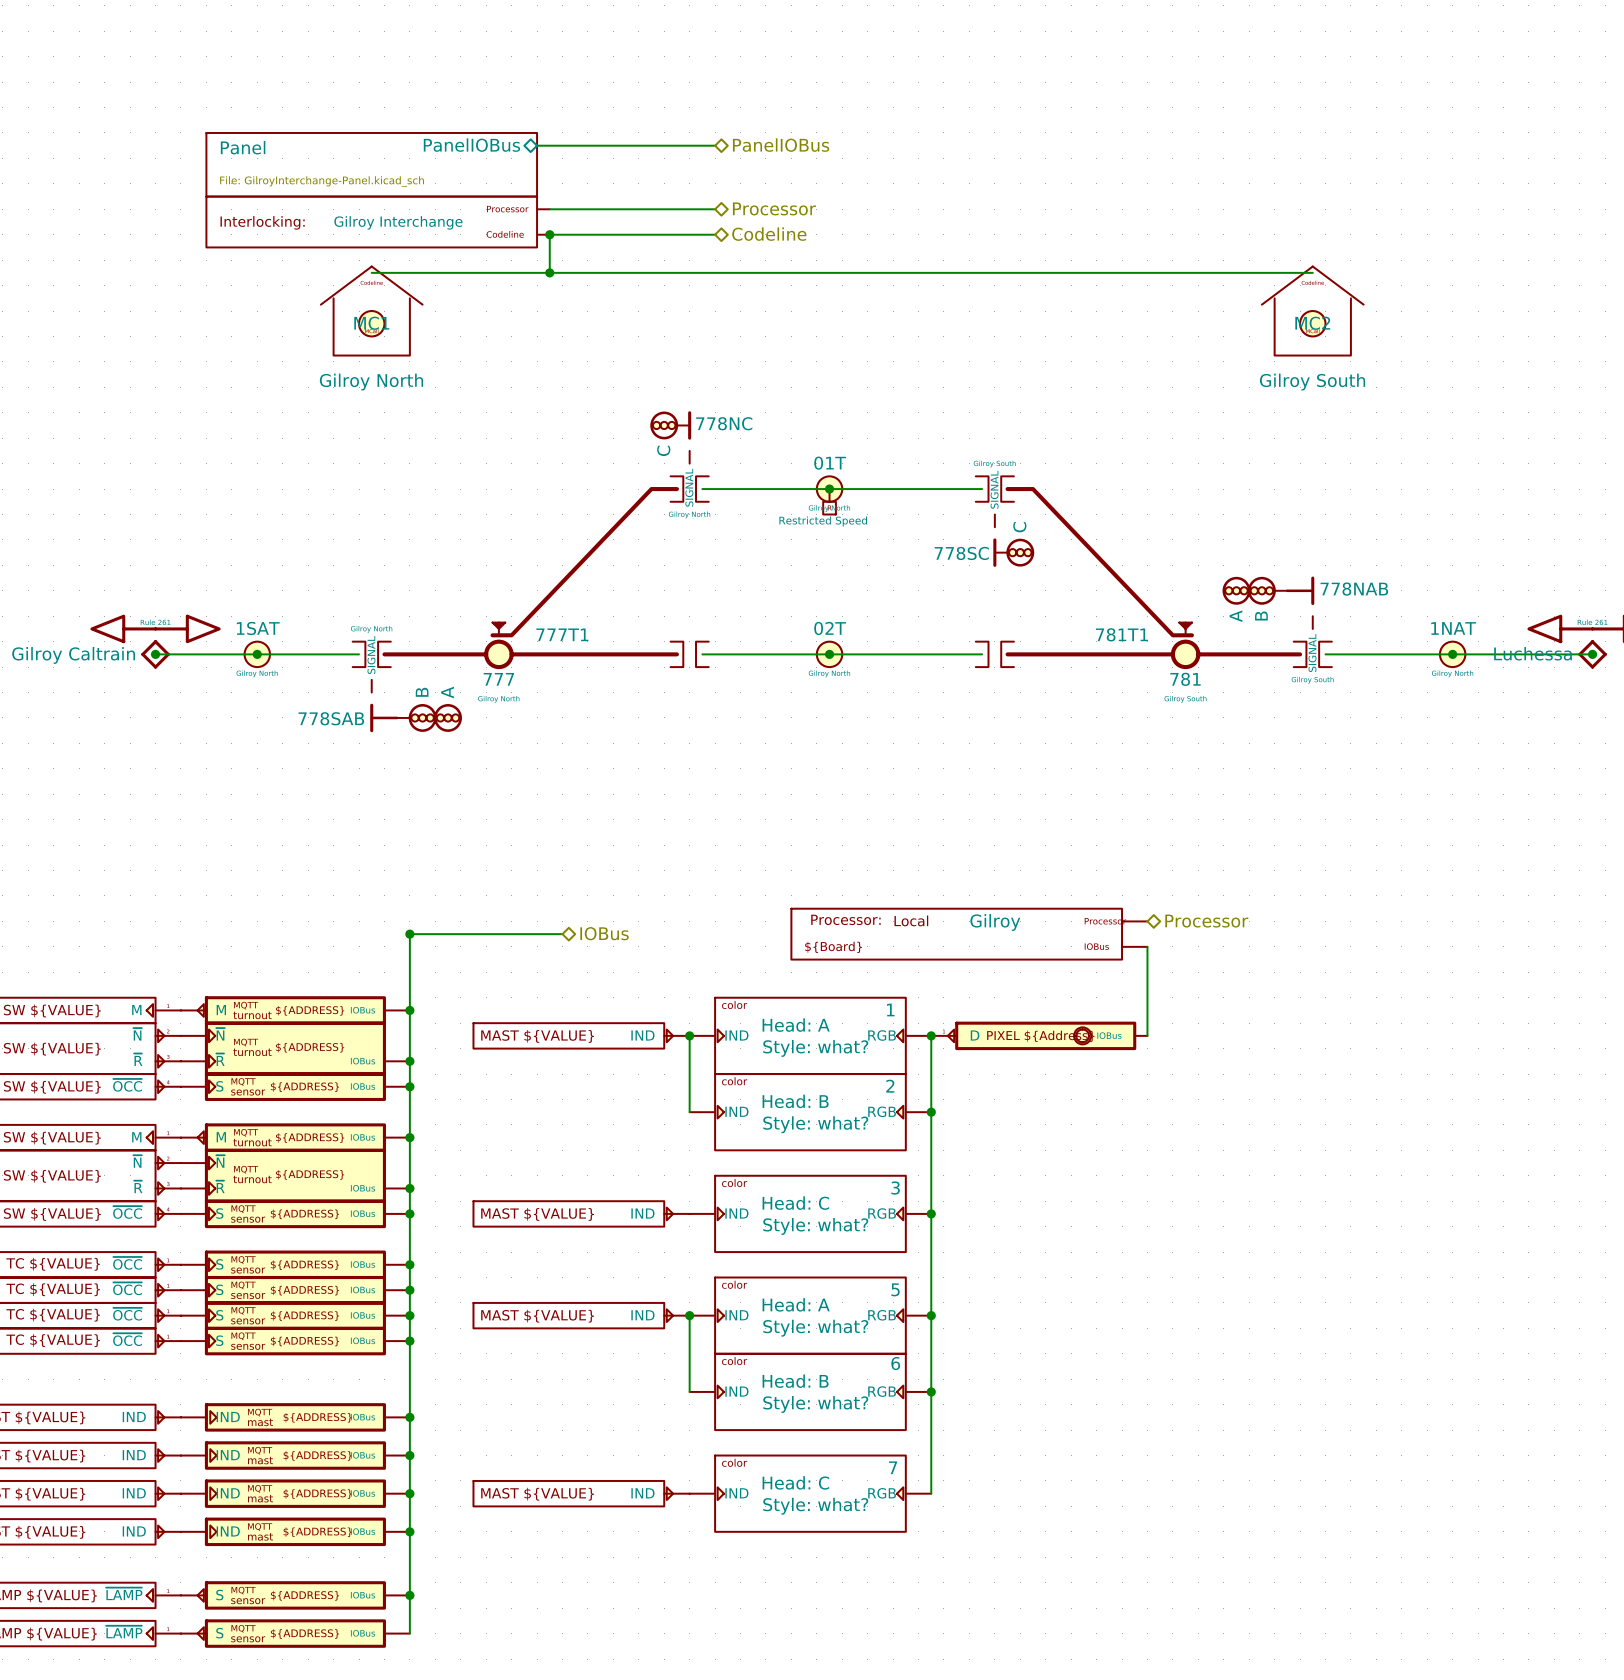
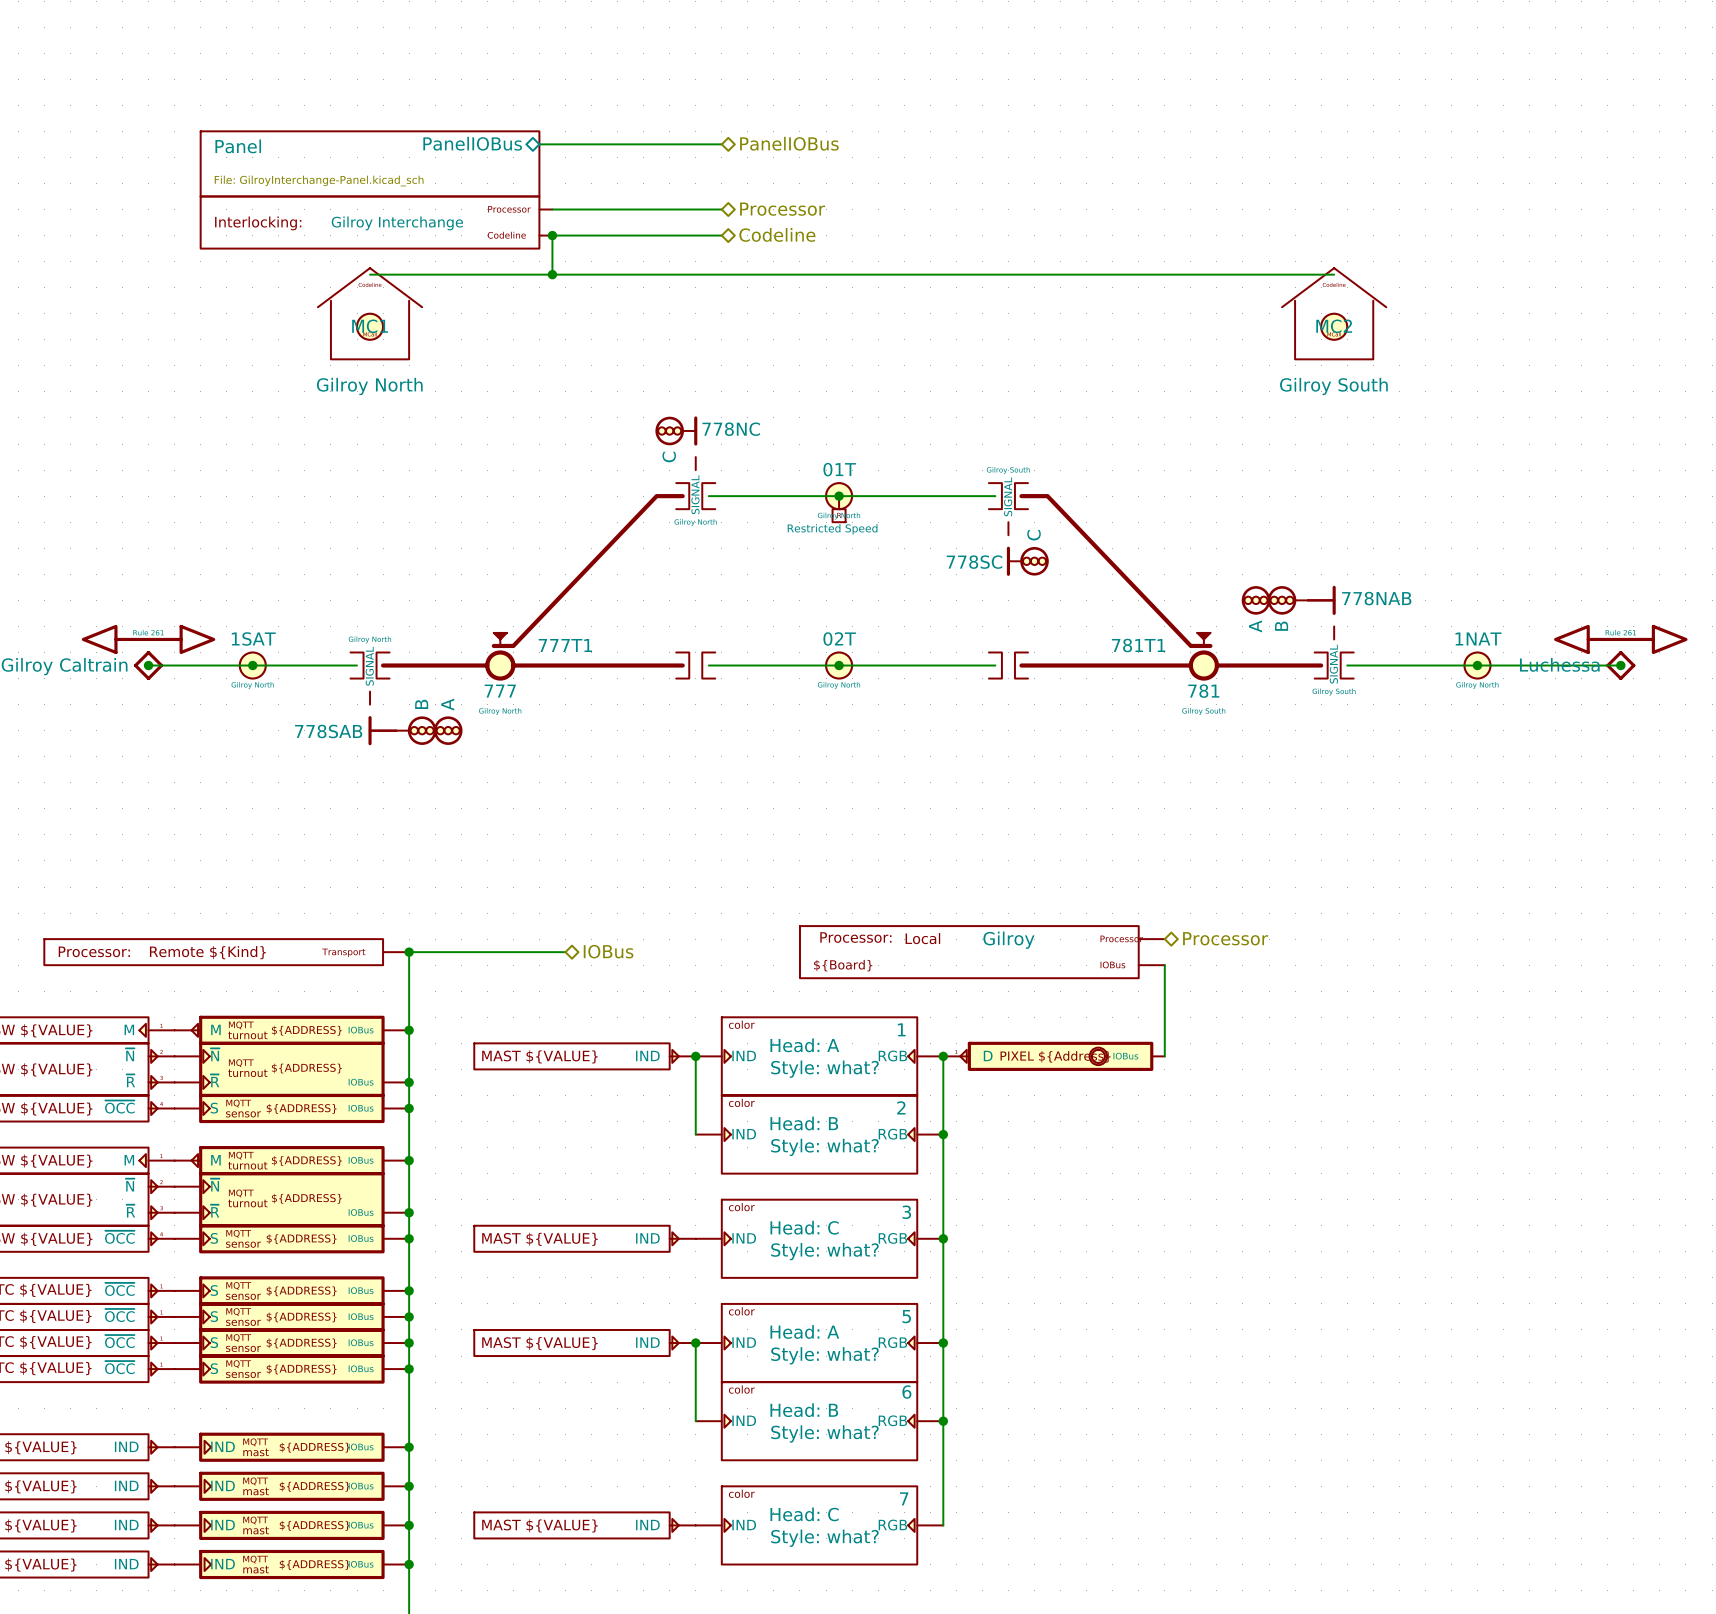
part: none -> (226, 952)

